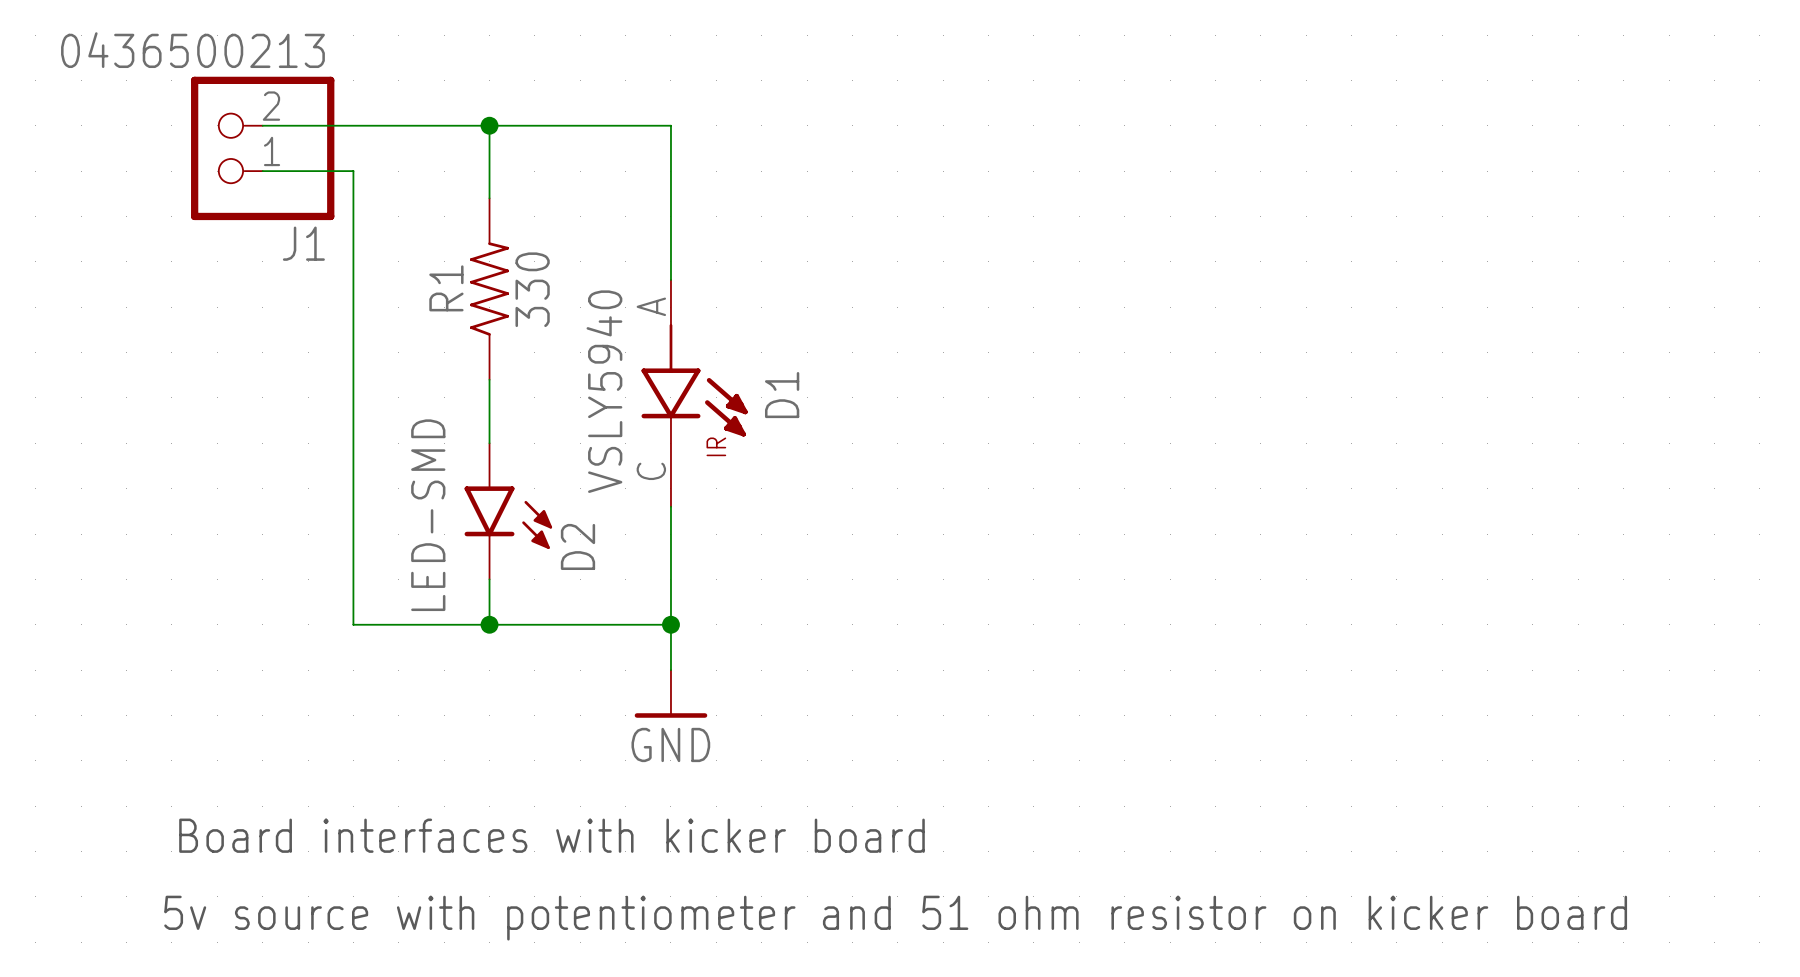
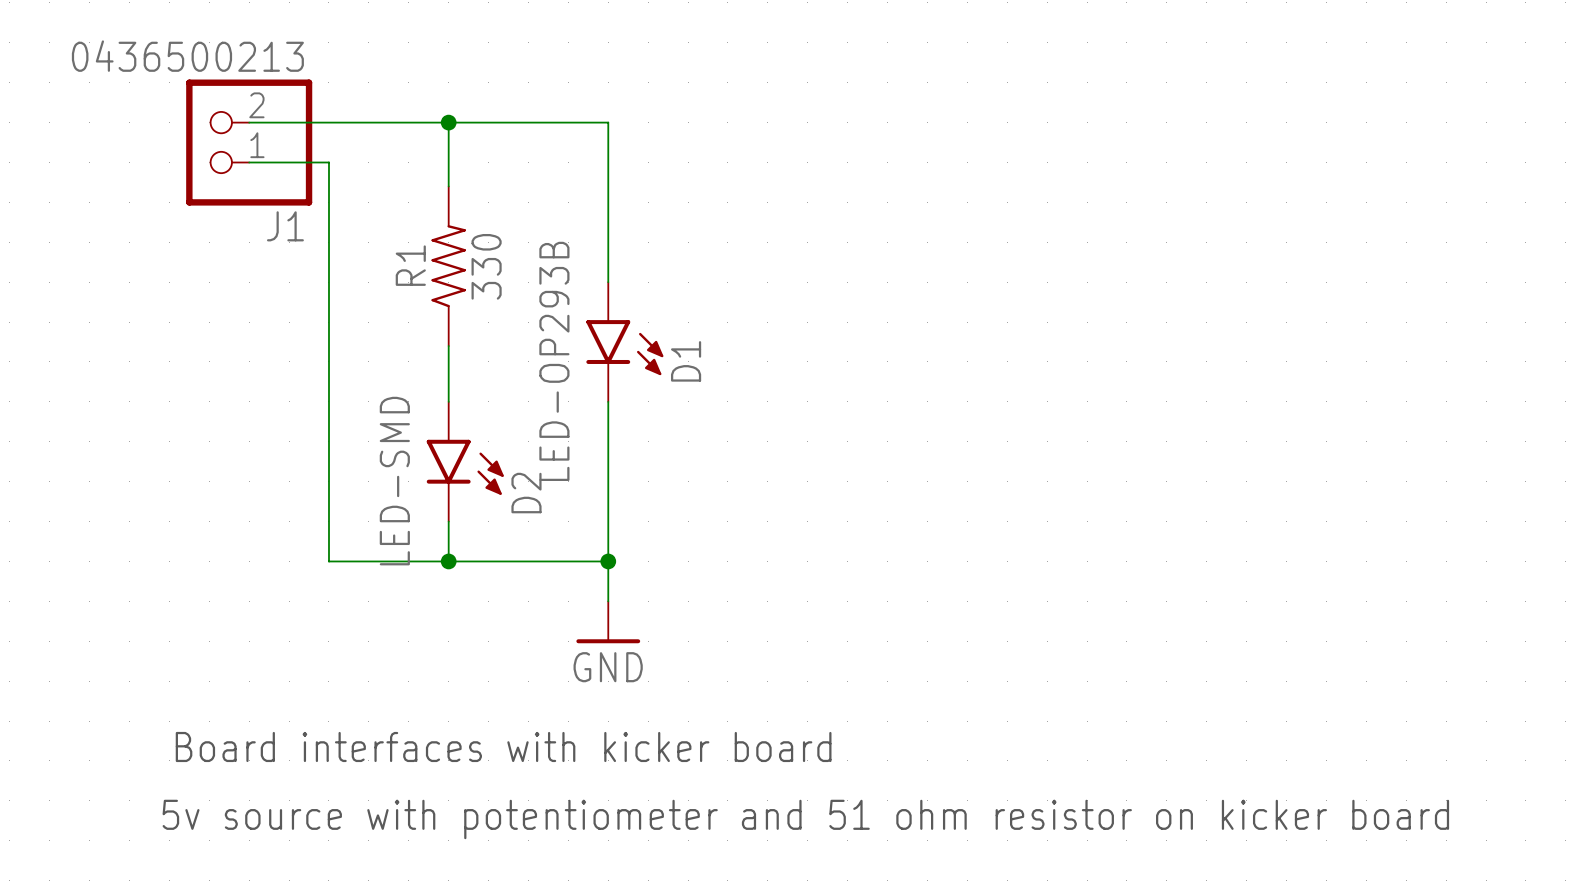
D1 symbol: [641, 279, 748, 507] -> [586, 282, 664, 402]
D1 value: VSLY5940 (604, 391) -> LED-OP293B (554, 361)
D2 value position: LED-SMD (428, 515) -> LED-SMD (394, 481)

